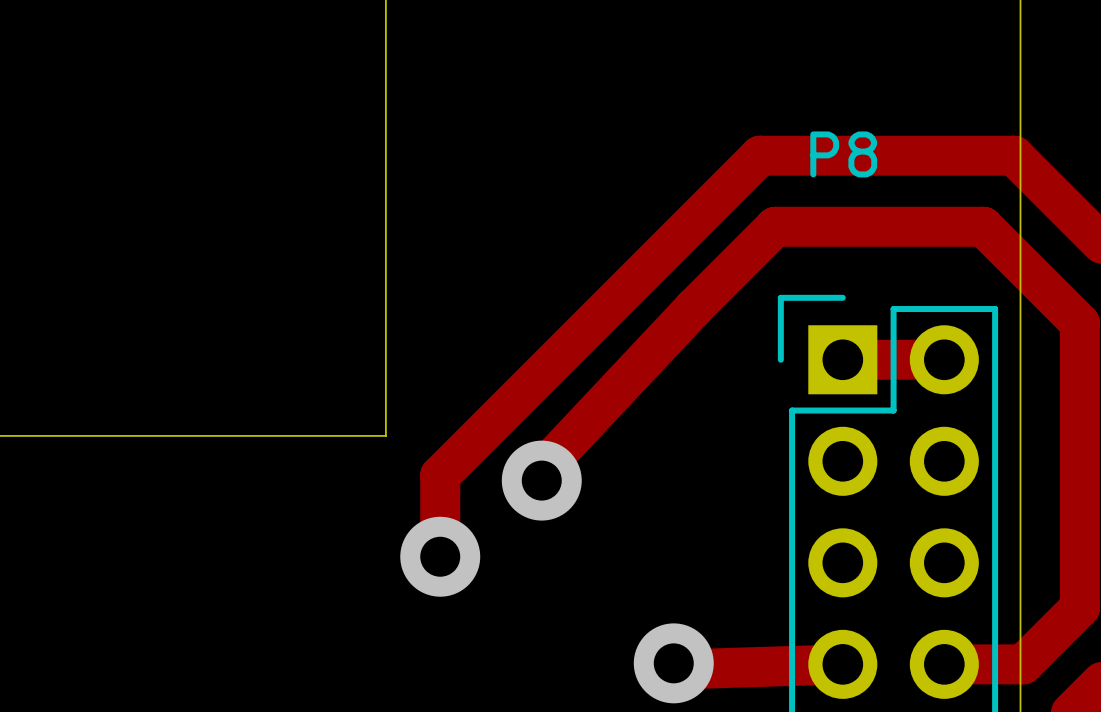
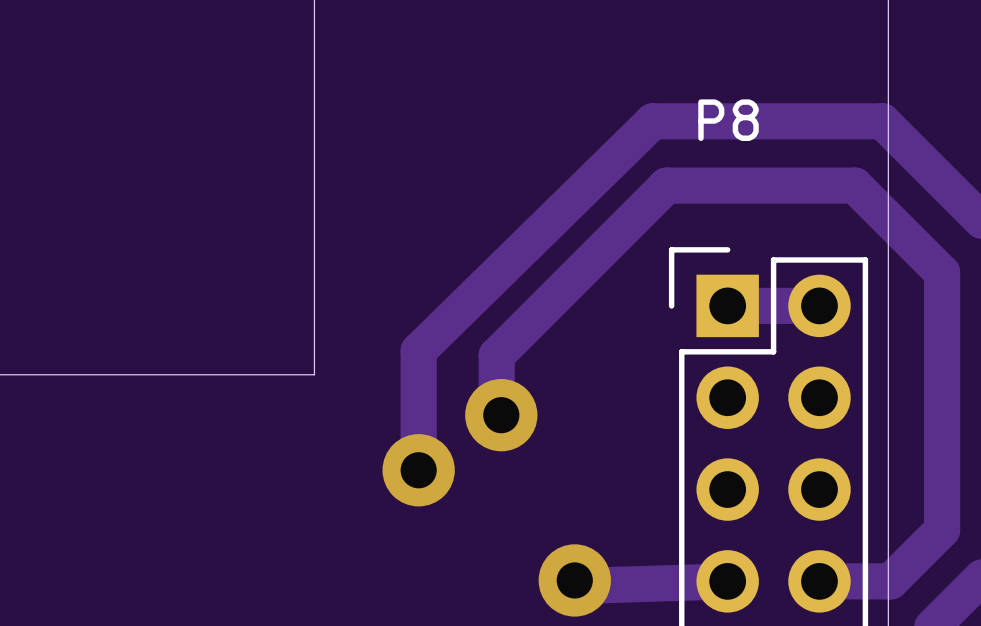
track: (760, 155) (440, 475) (440, 556) -> (652, 121) (418, 350) (418, 470)
track: (694, 307) (536, 475) (541, 480) -> (593, 259) (496, 355) (496, 410) (501, 415)
via: (541, 480) -> none
via: none -> (501, 415)
via: none -> (418, 470)
via: (440, 556) -> none

